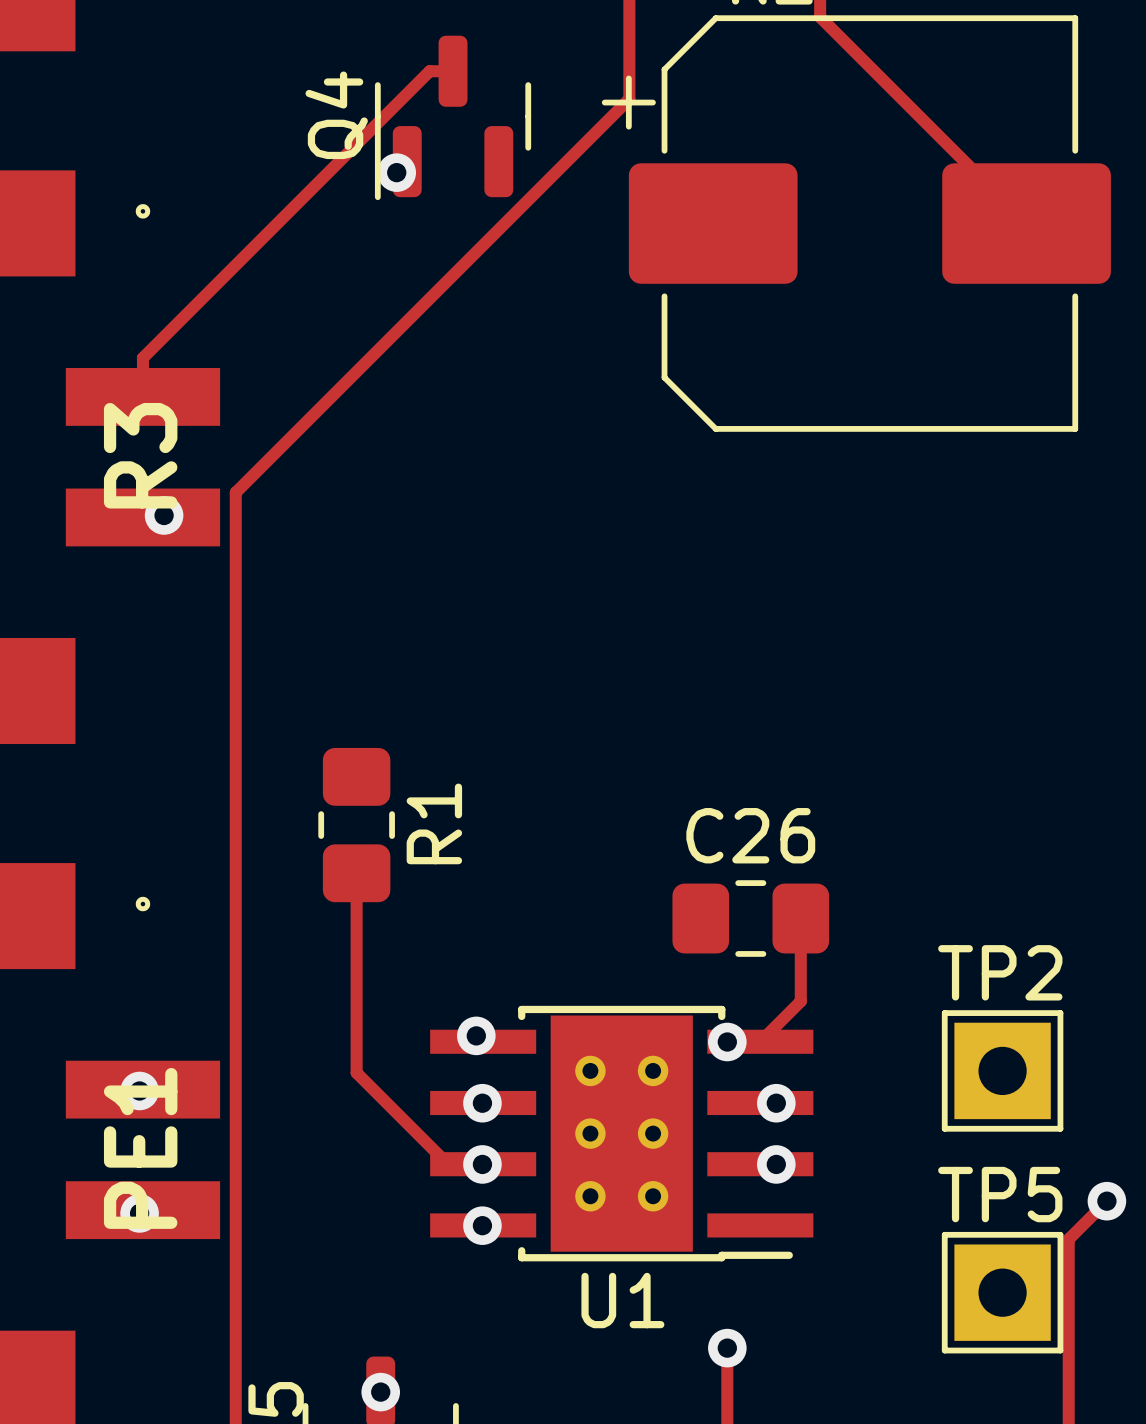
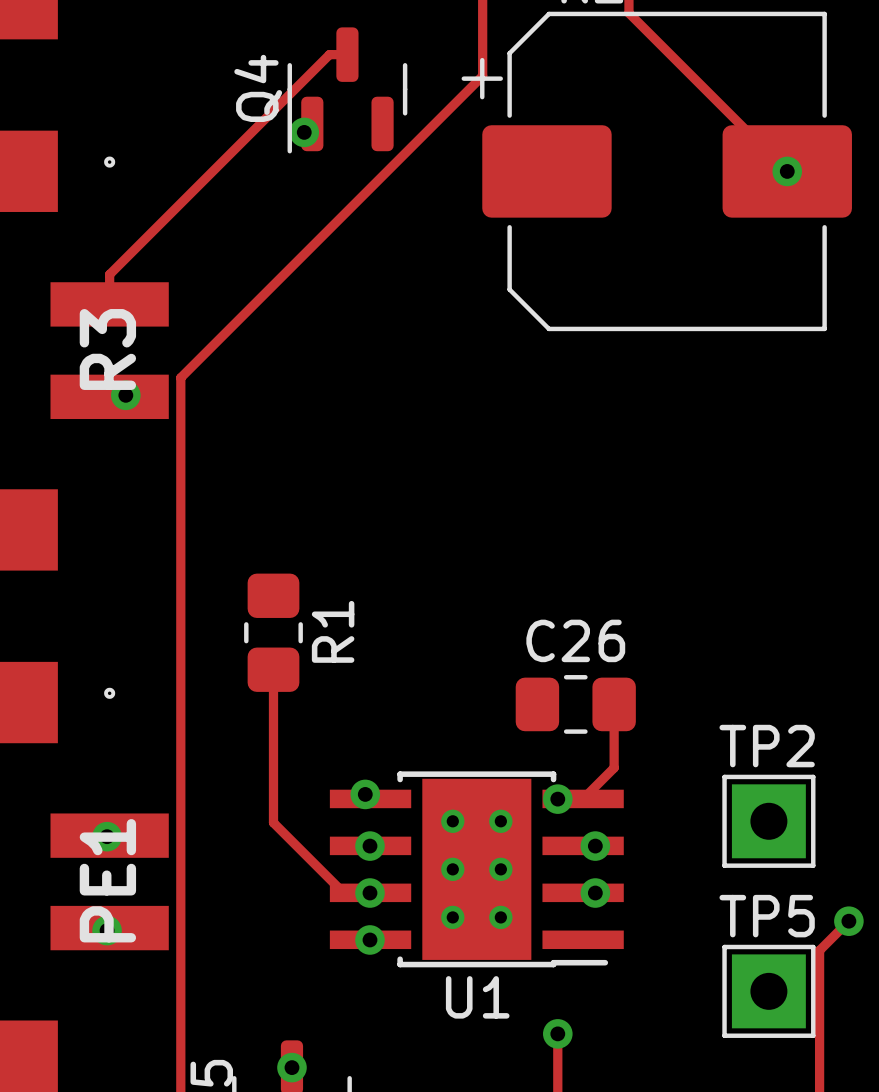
via: none -> (787, 171)

